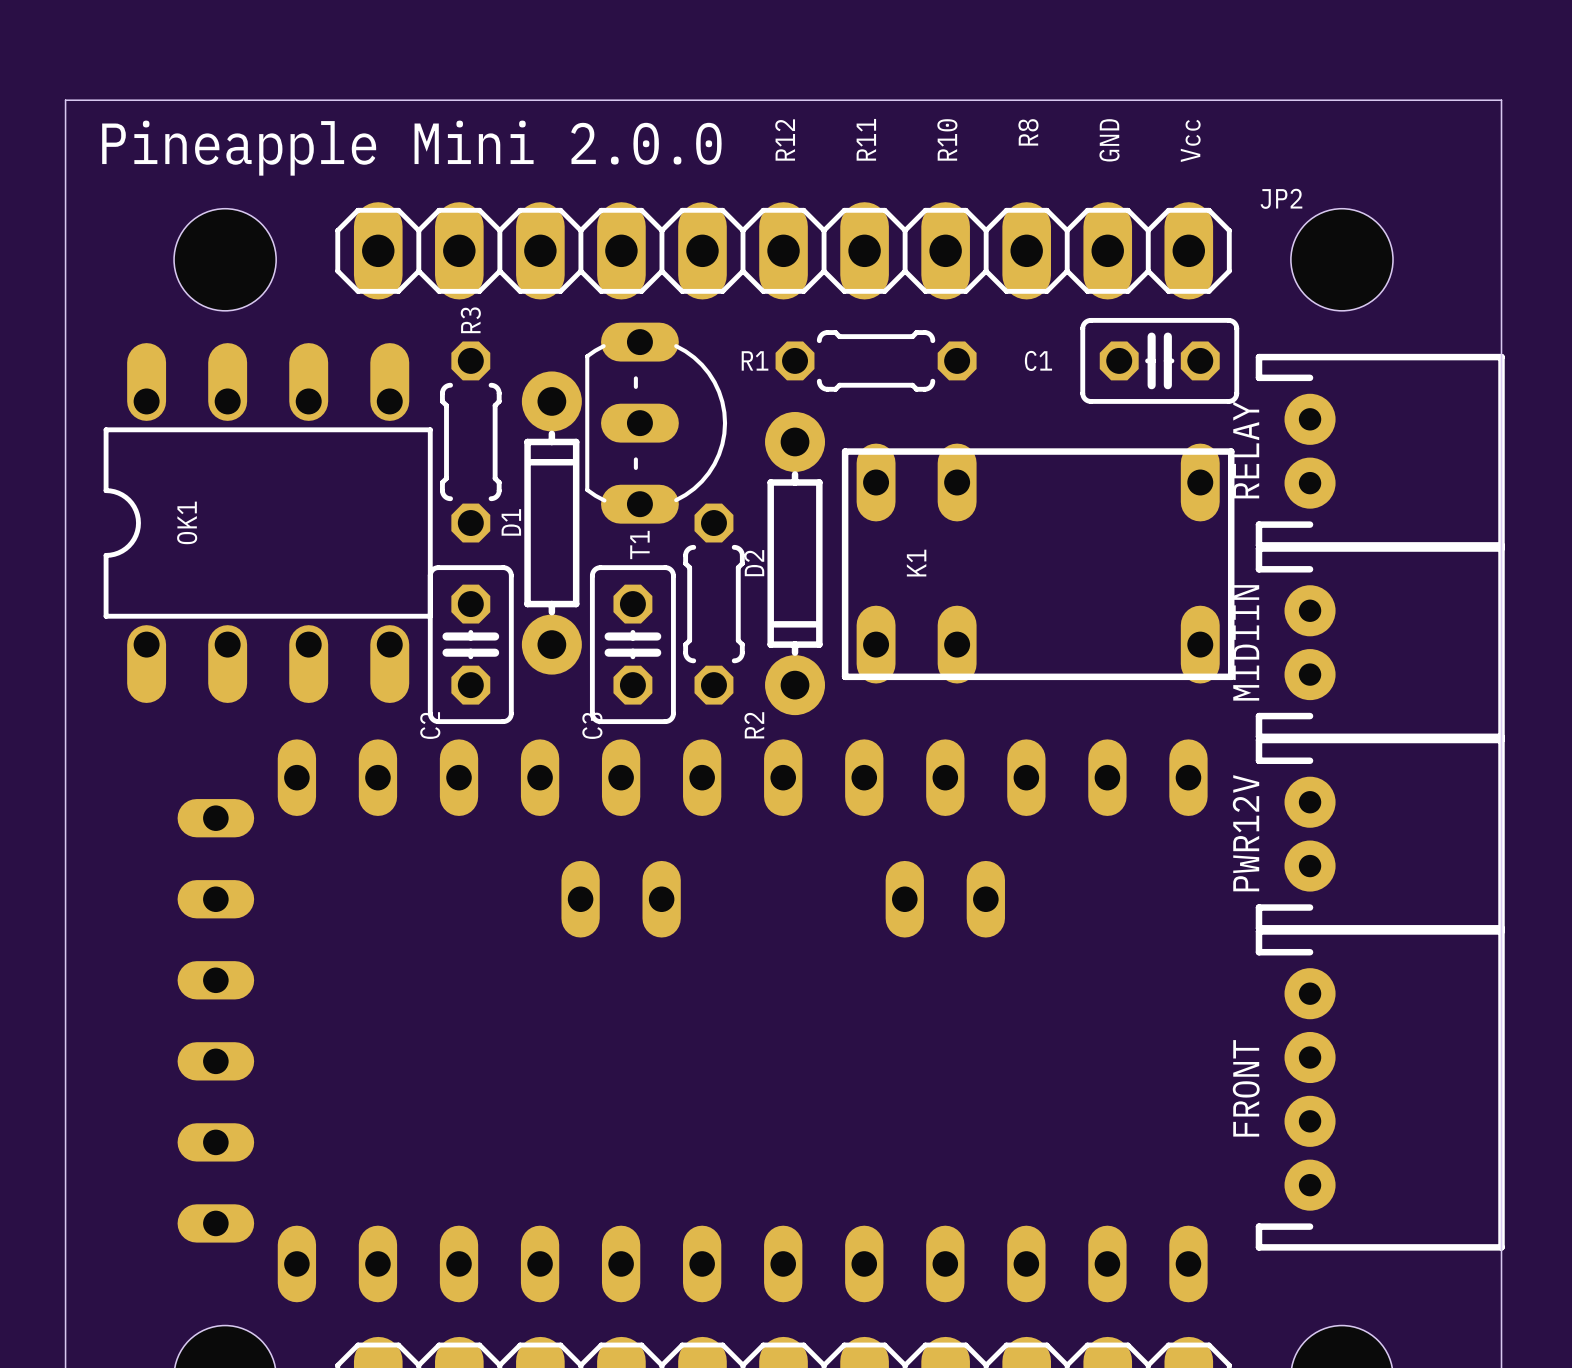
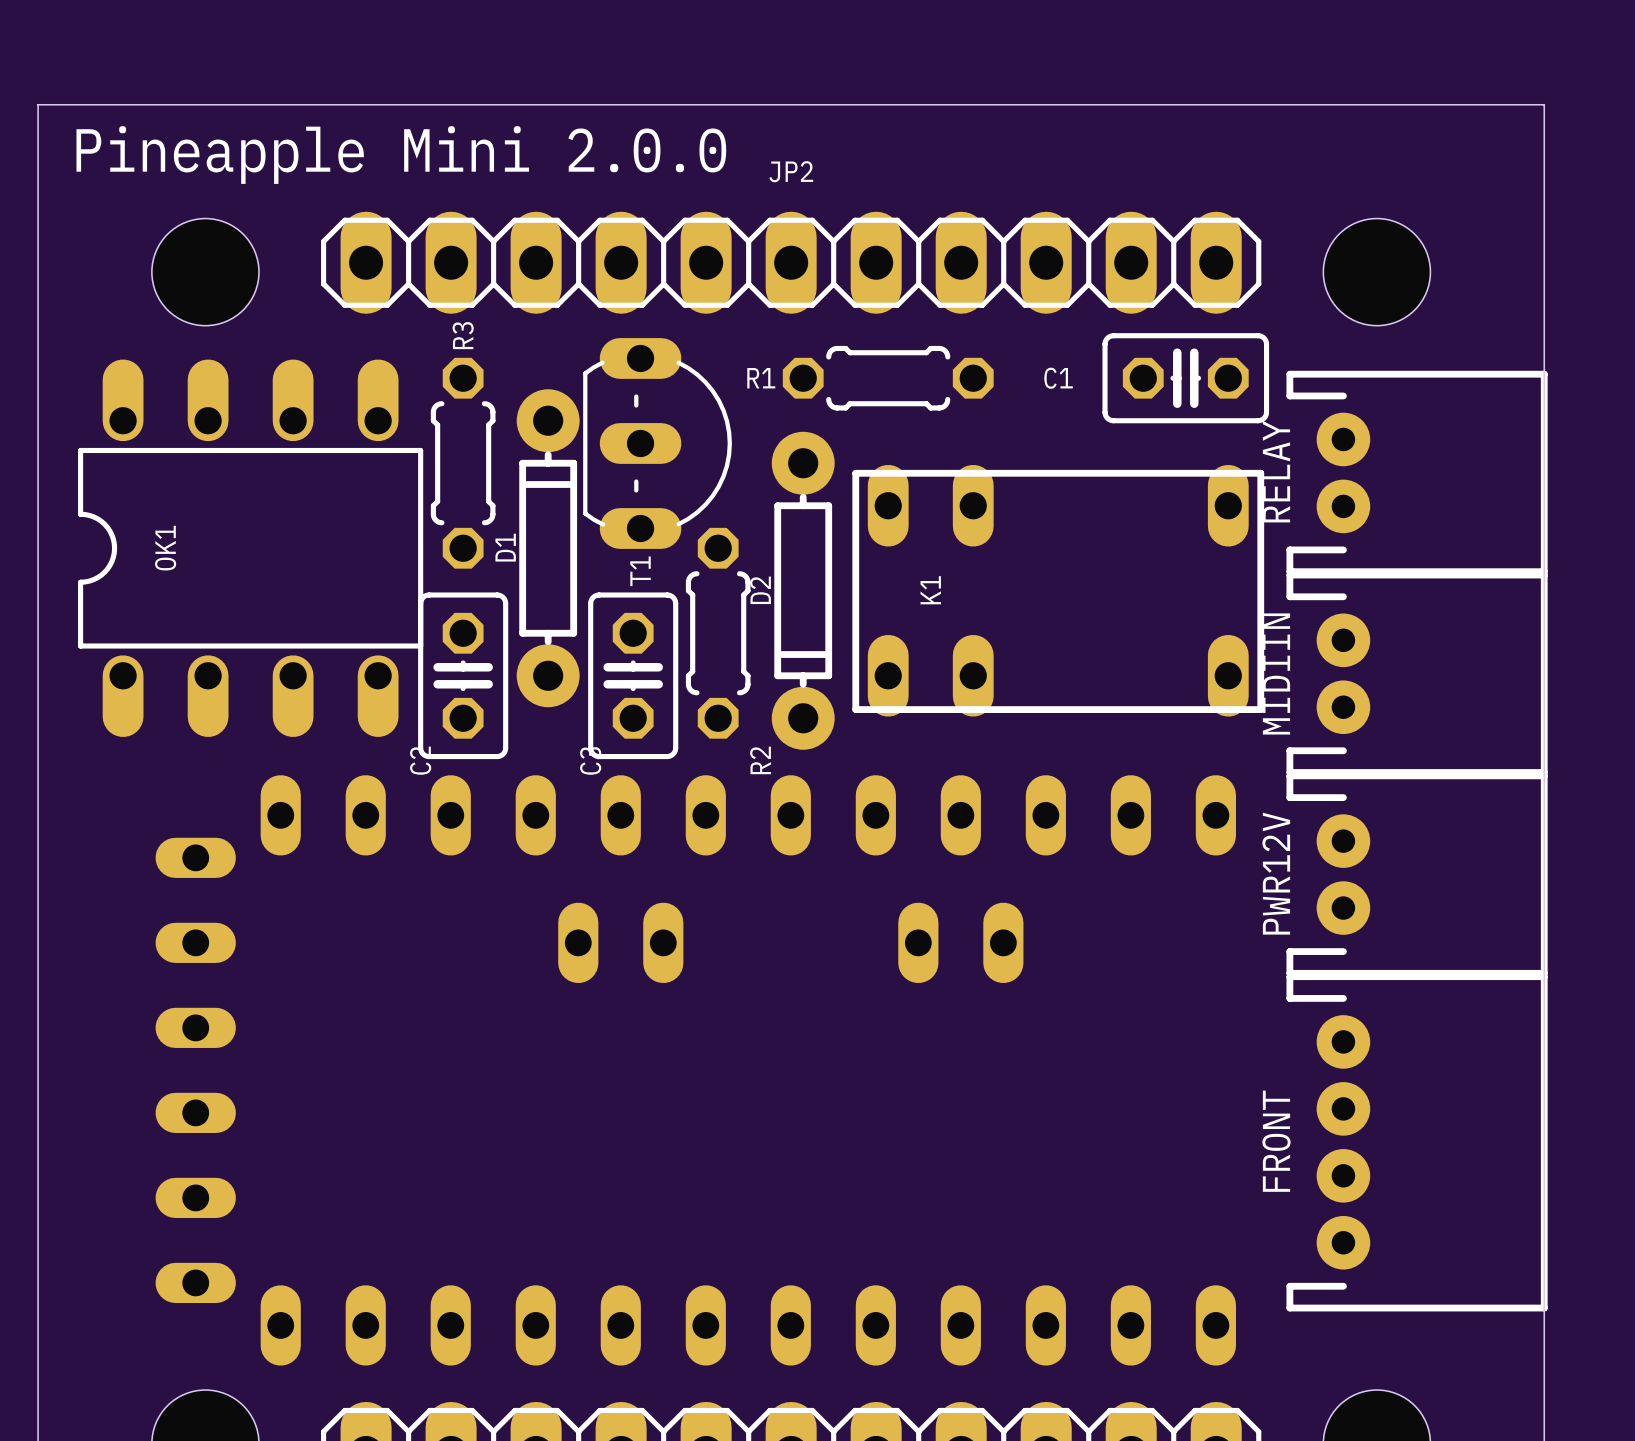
text: R8 (1028, 132) -> none
text: R11 (866, 139) -> none
text: R10 (947, 139) -> none
text: R12 (785, 140) -> none
text: GND (1109, 140) -> none
text: Vcc (1190, 140) -> none
JP2 name position: JP2 (1281, 198) -> JP2 (791, 171)

